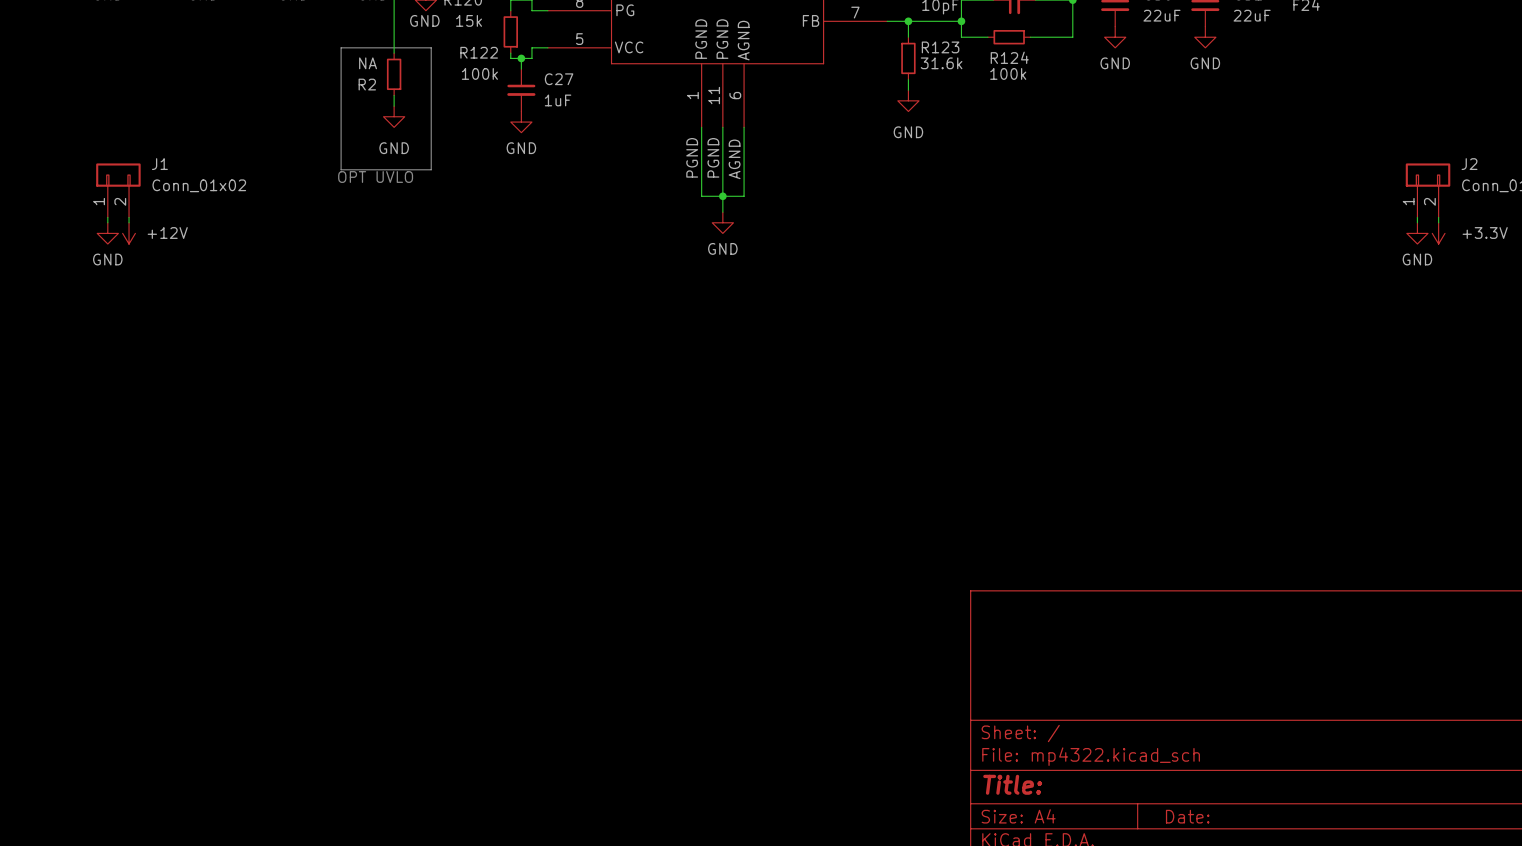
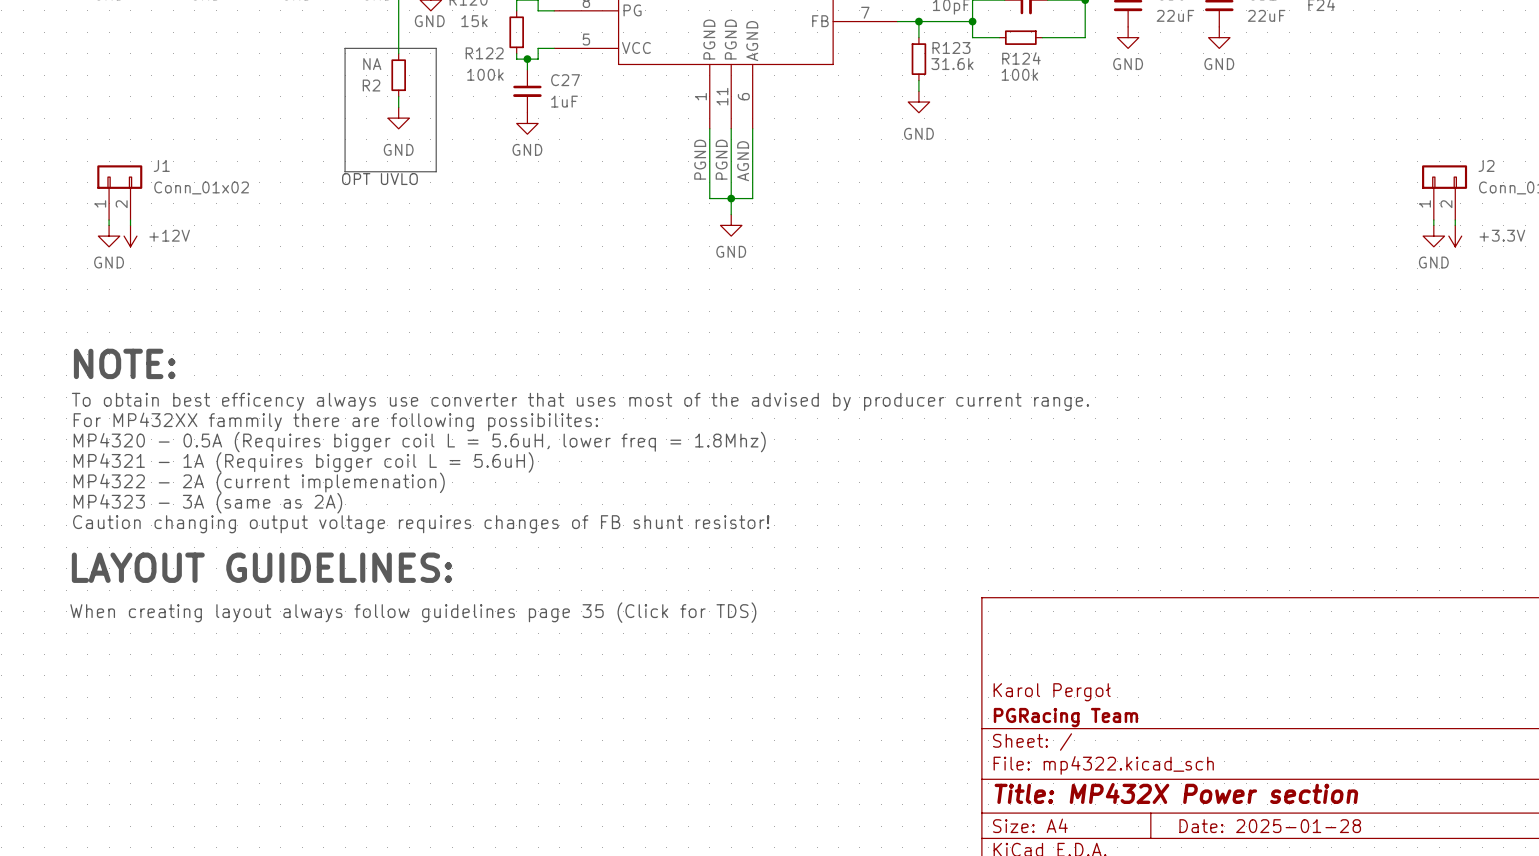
text: none -> NOTE: (124, 363)
text: none -> To obtain best efficency always use converter that uses most of the advised by producer current range. (580, 401)
text: none -> For MP432XX fammily there are following possibilites: (335, 421)
text: none -> MP4320 - 0.5A (Requires bigger coil L = 5.6uH, lower freq = 1.8Mhz) (419, 442)
text: none -> MP4321 - 1A (Requires bigger coil L = 5.6uH) (303, 462)
text: none -> MP4322 - 2A (current implemenation) (259, 482)
text: none -> MP4323 - 3A (same as 2A) (207, 503)
text: none -> Caution changing output voltage requires changes of FB shunt resistor! (421, 524)
text: none -> LAYOUT GUIDELINES: (261, 567)
text: none -> When creating layout always follow guidelines page 35 (Click for TDS) (413, 612)
title block: none -> Karol Pergoł (1052, 692)
title block: none -> PGRacing Team (1065, 717)
title block: Title: (1012, 784) -> Title: MP432X Power section (1176, 793)
title block: Date: (1187, 816) -> Date: 2025-01-28 (1270, 826)

